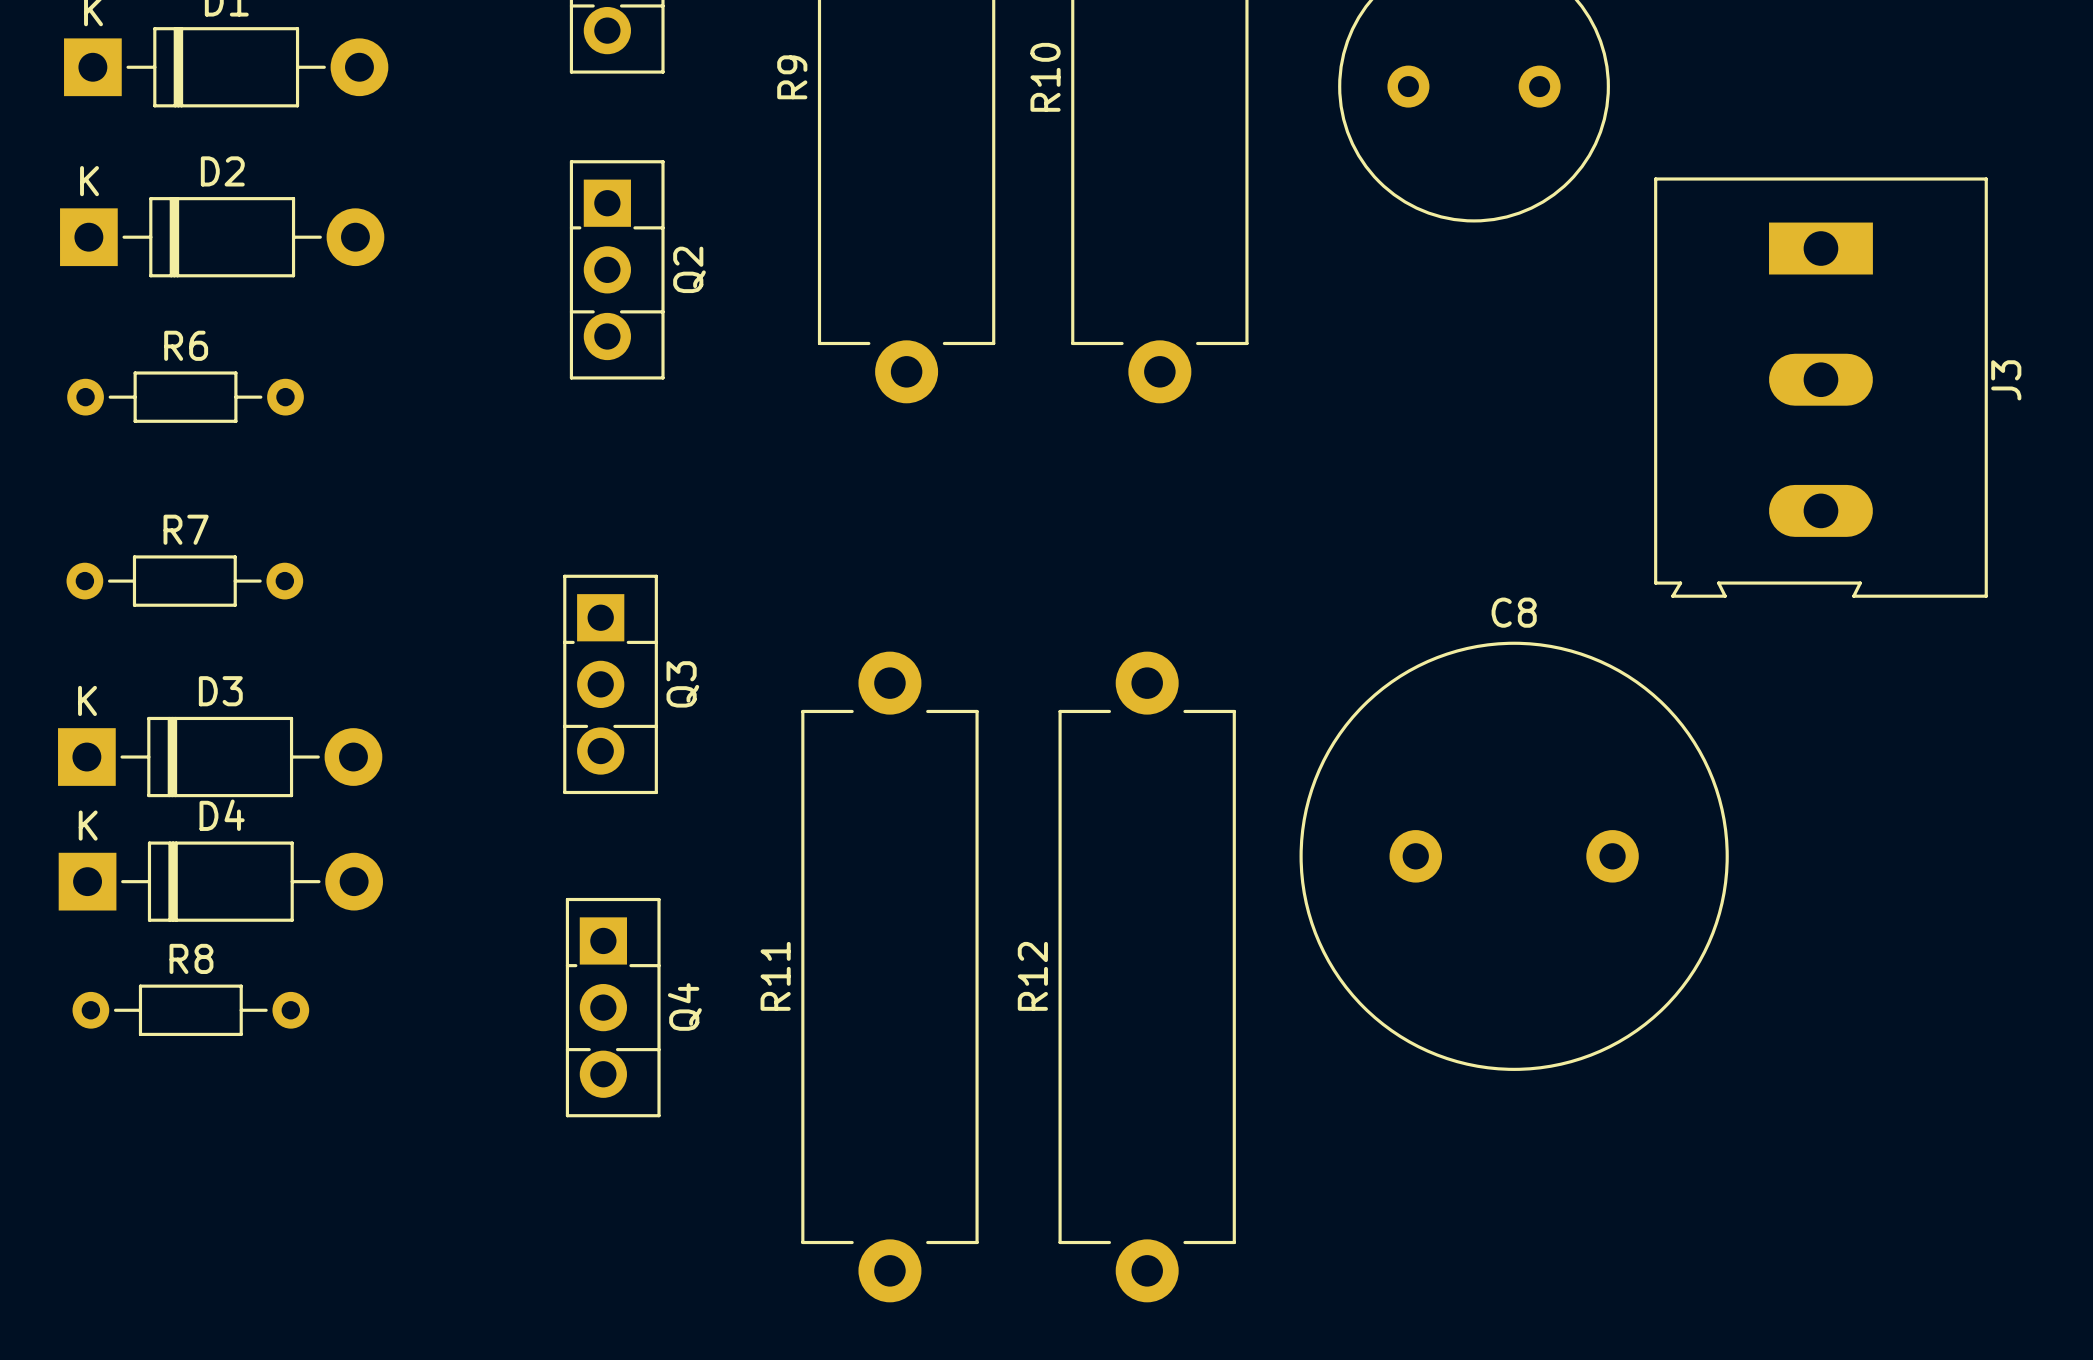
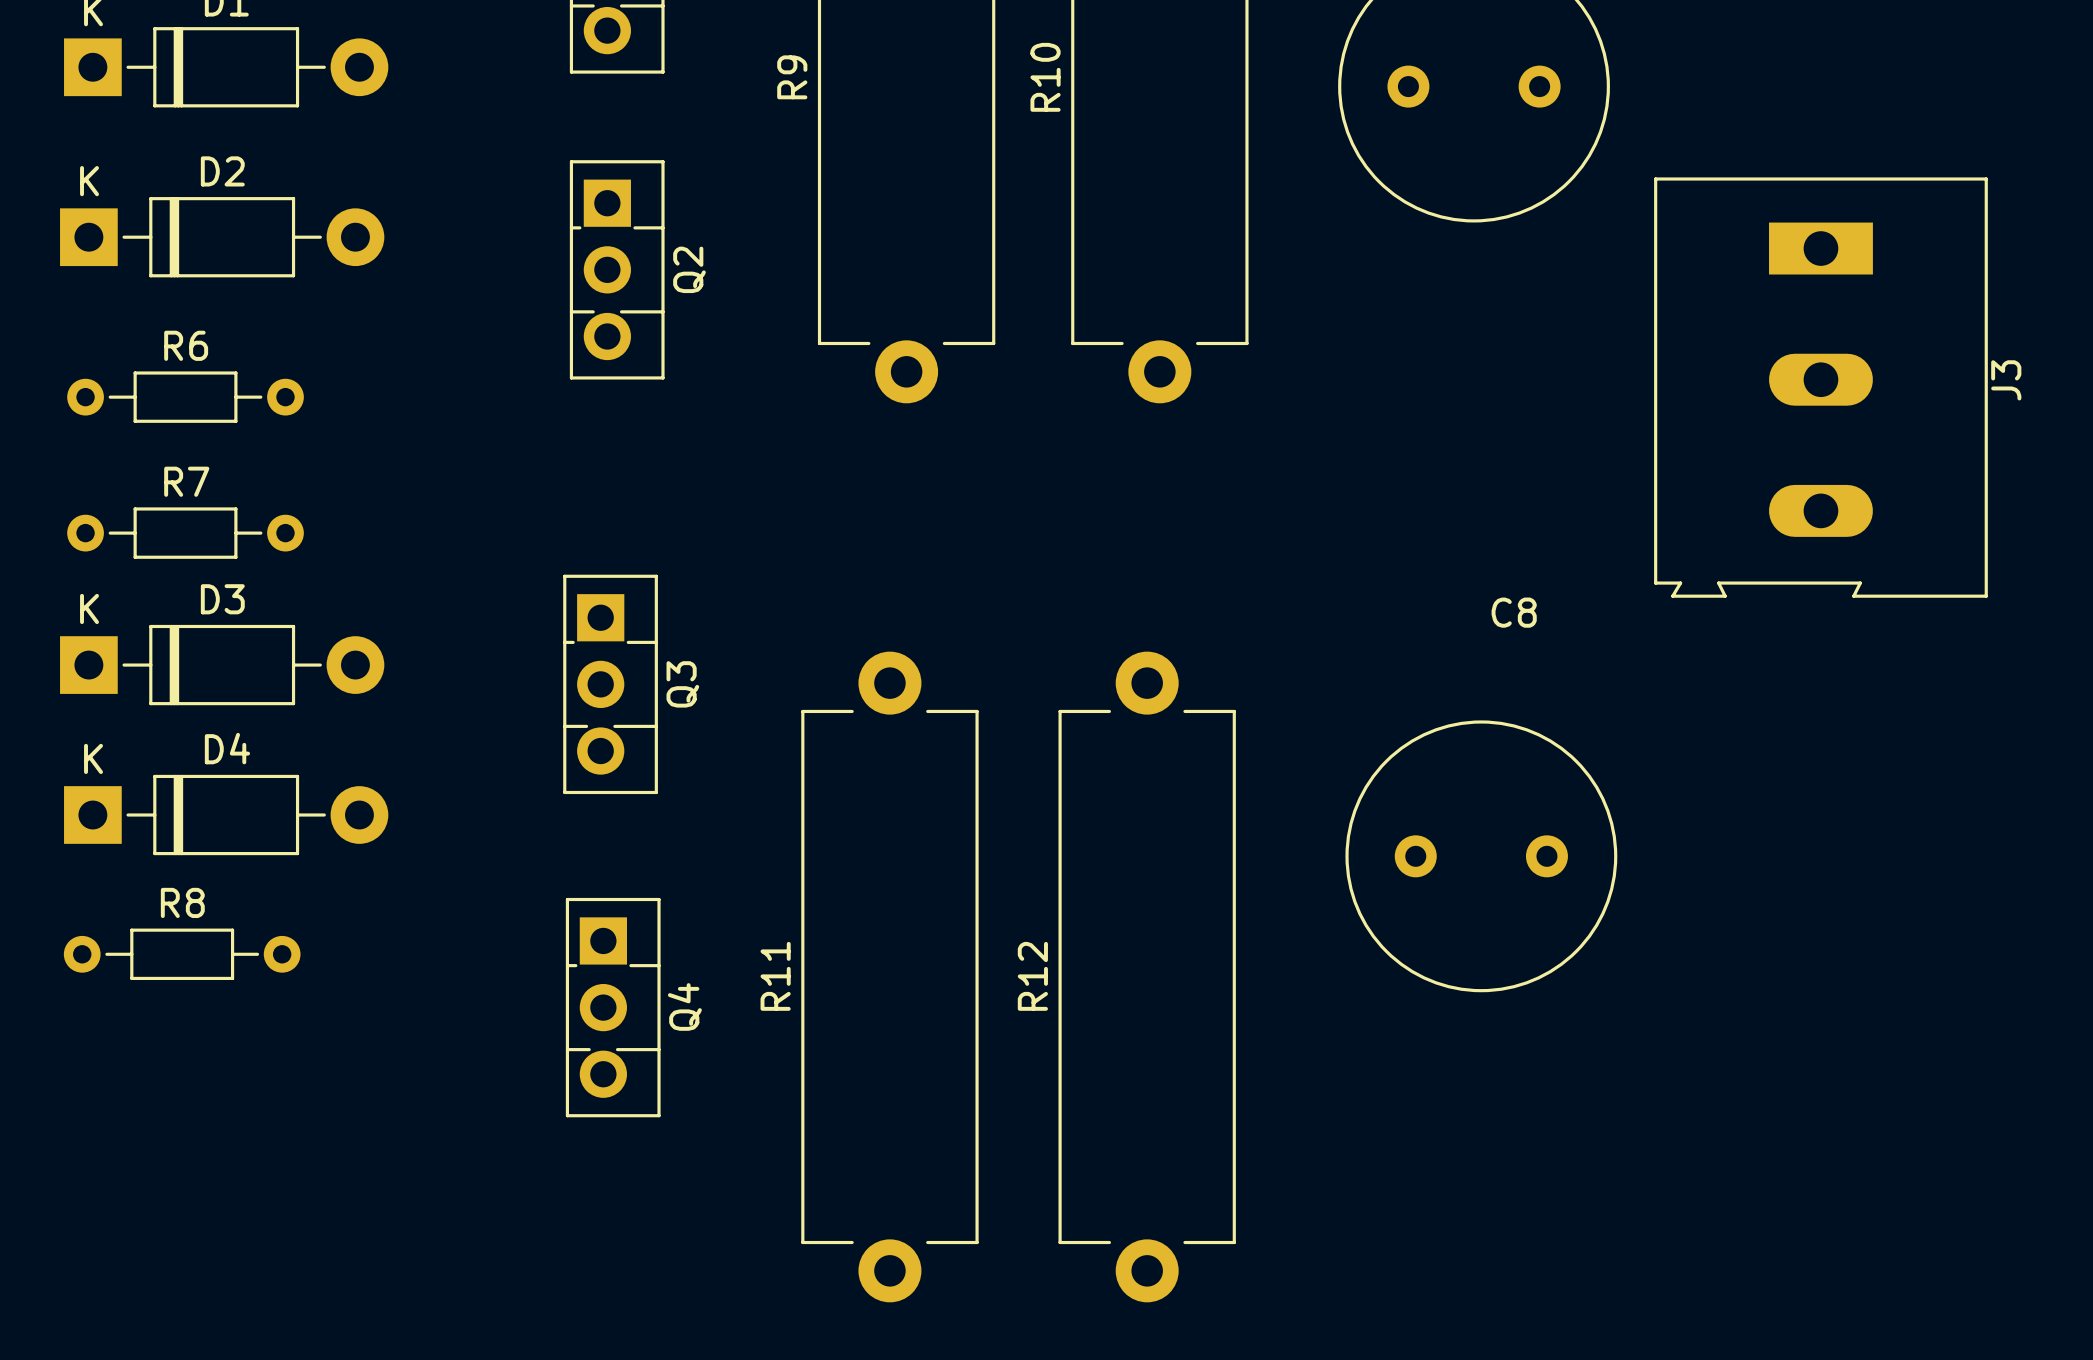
R7 position: (184, 581) -> (185, 533)
C8 footprint: [1299, 641, 1729, 1071] -> [1345, 720, 1618, 993]
D3 position: (220, 757) -> (222, 665)
D4 position: (220, 881) -> (226, 815)
R8 position: (190, 1010) -> (182, 954)

